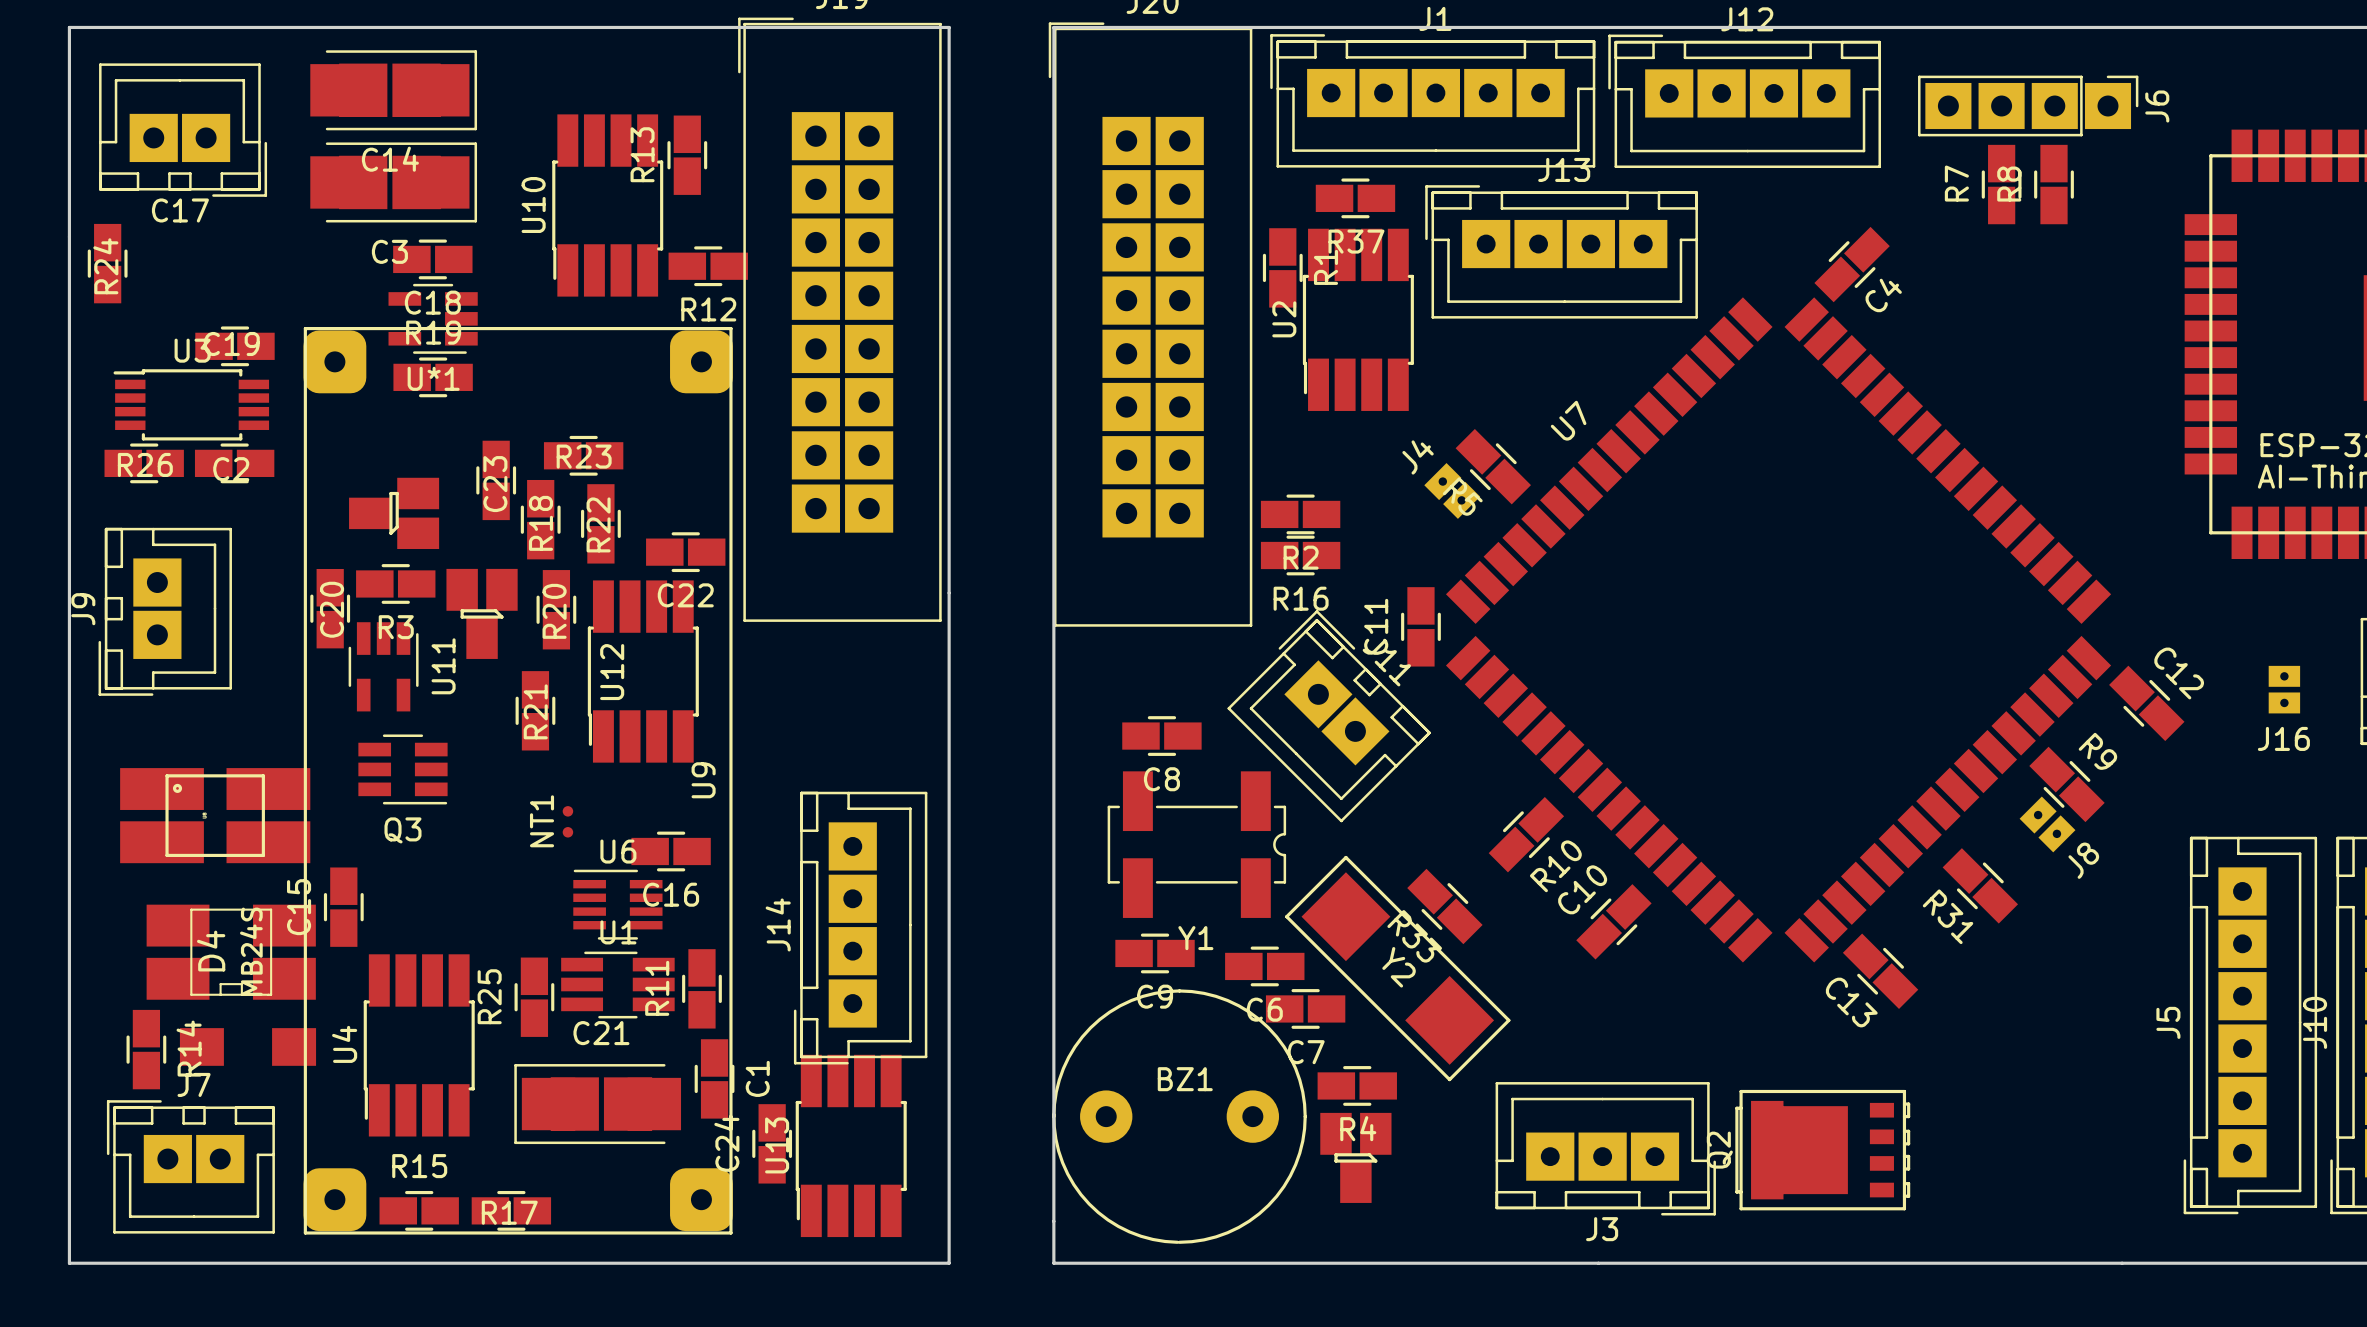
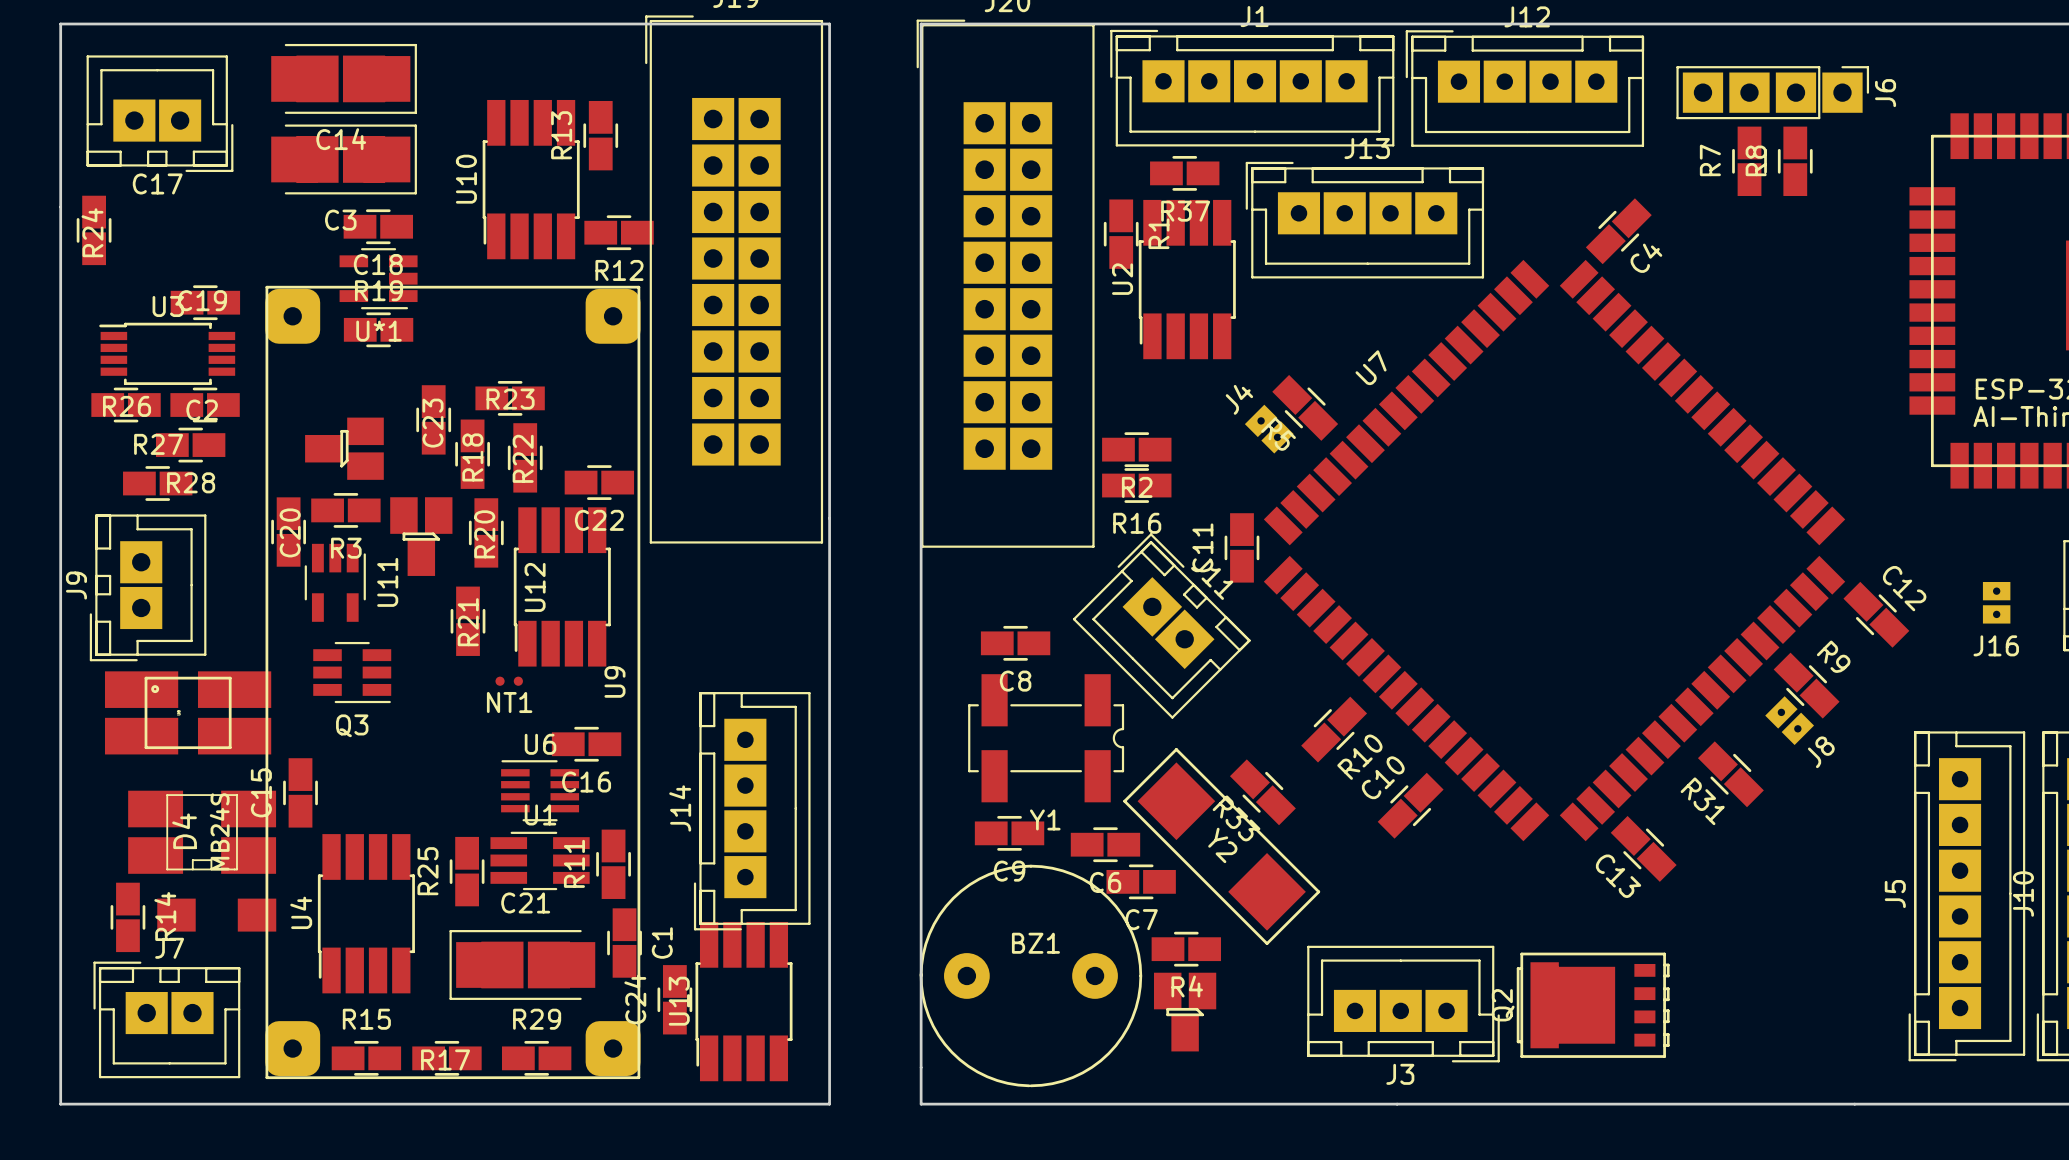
R28: none -> (190, 445)
R27: none -> (157, 483)
J9 position: (165, 611) -> (148, 587)
NT1 rotation: 0° (567, 821) -> 90° clockwise (509, 681)
NT1 position: (567, 821) -> (509, 681)
R29: none -> (536, 1058)

